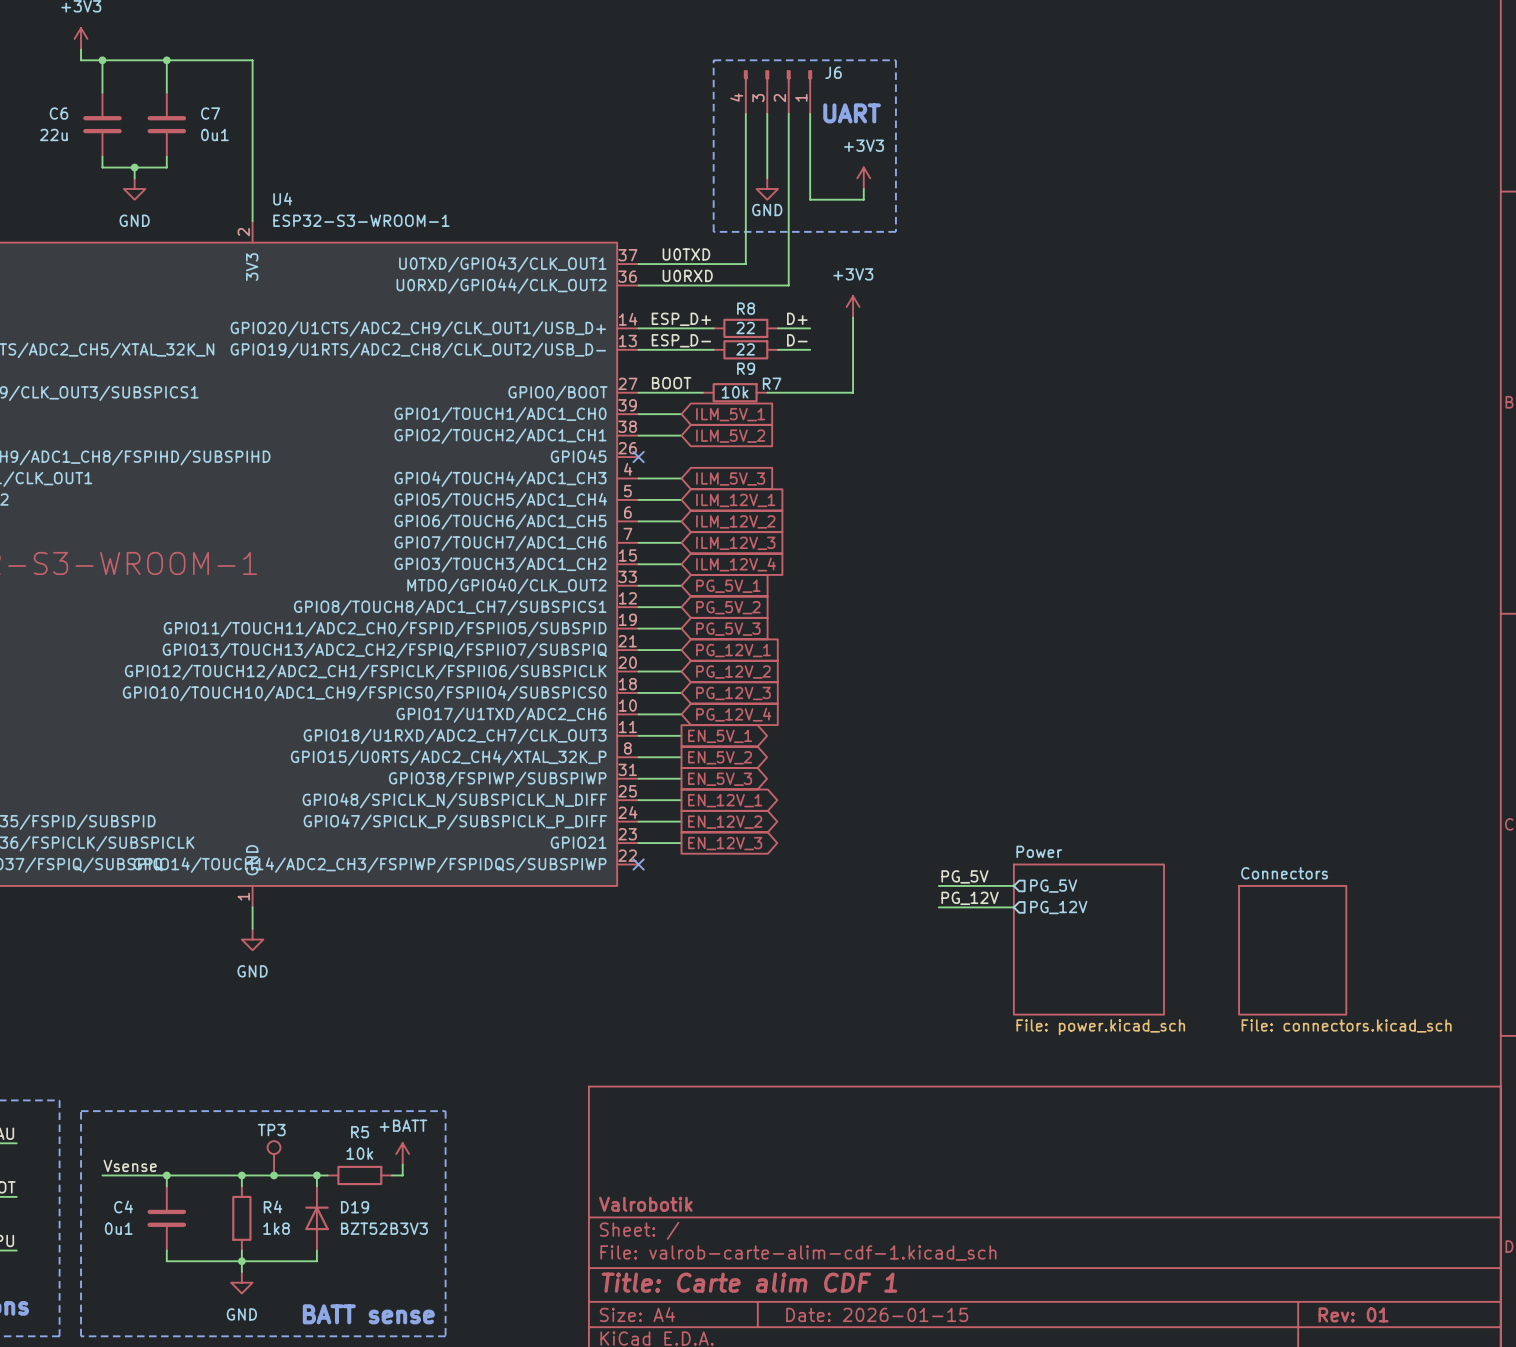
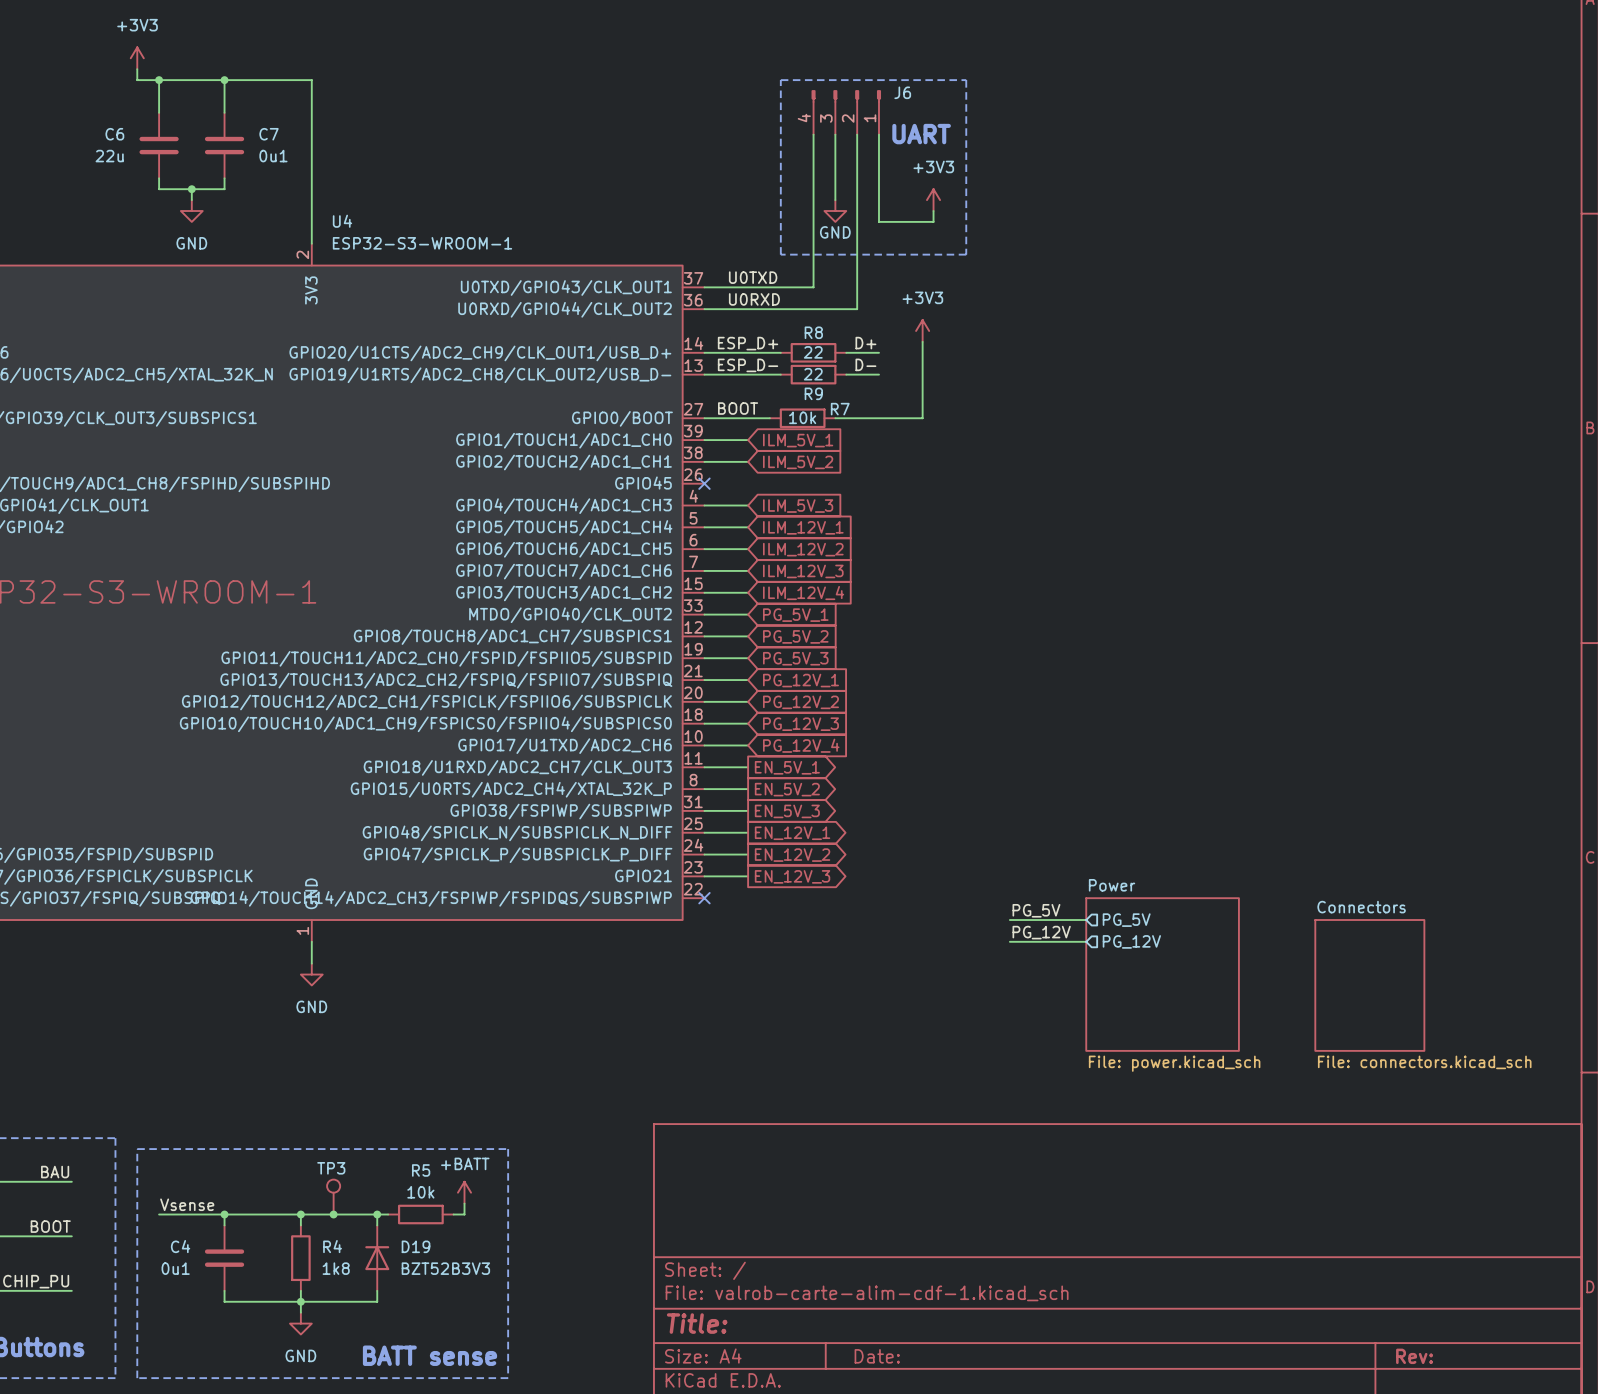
title block: Valrobotik (645, 1204) -> none
title block: Title: Carte alim CDF 1 (749, 1282) -> Title: (697, 1323)
title block: Date: 2026-01-15 (877, 1314) -> Date: (877, 1356)
title block: Rev: 01 (1353, 1314) -> Rev: (1414, 1356)

